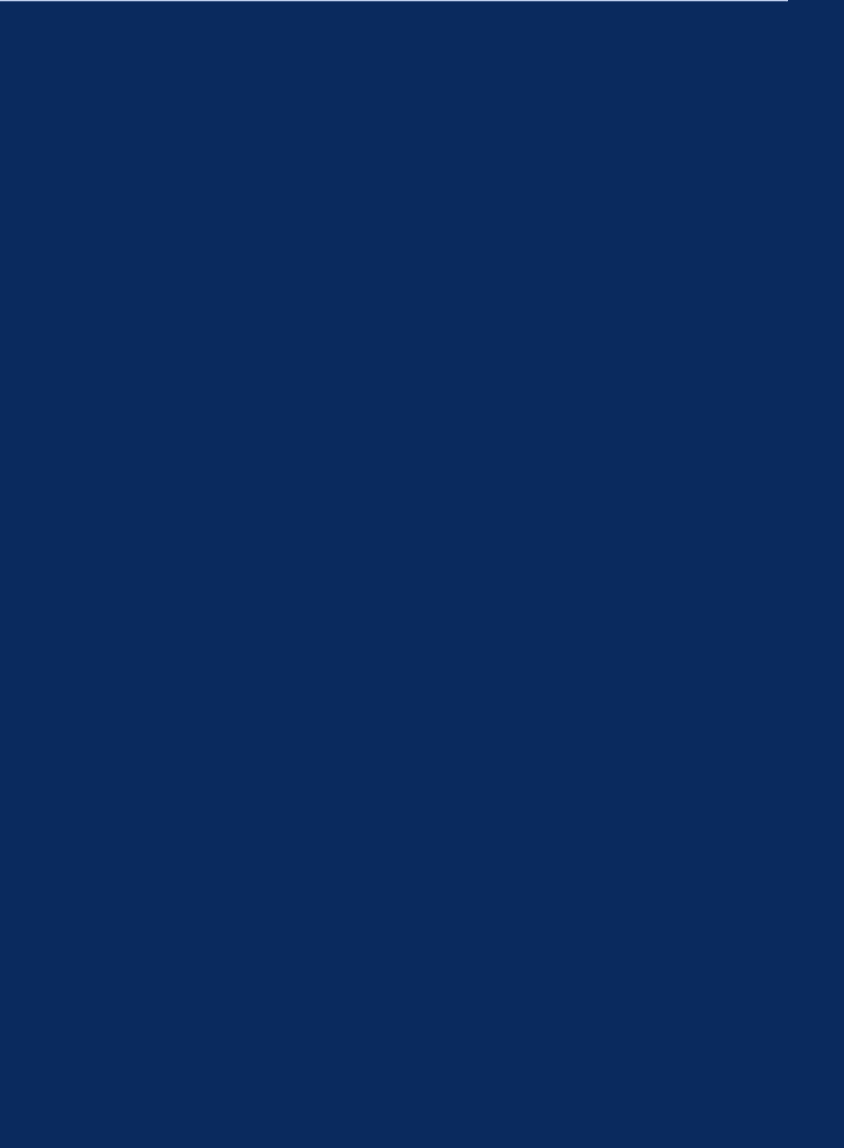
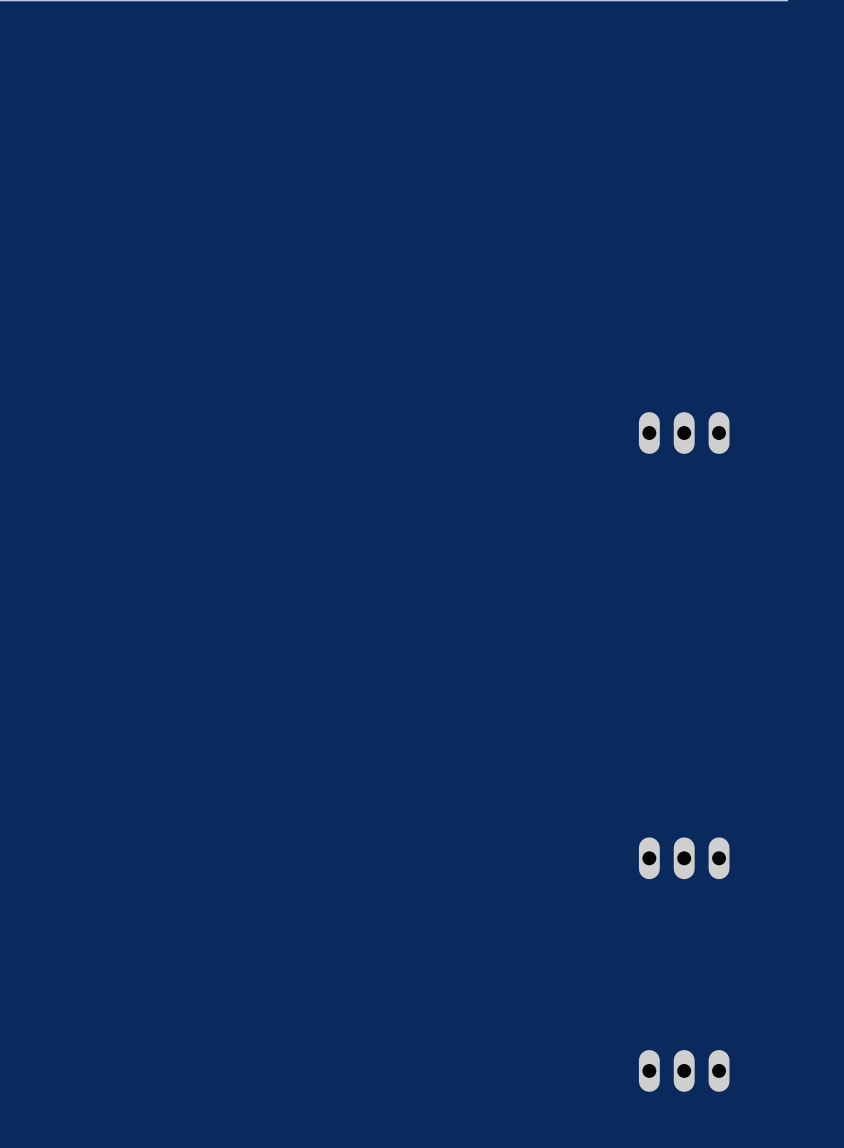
part: none -> (684, 433)
part: none -> (684, 858)
part: none -> (684, 1070)

